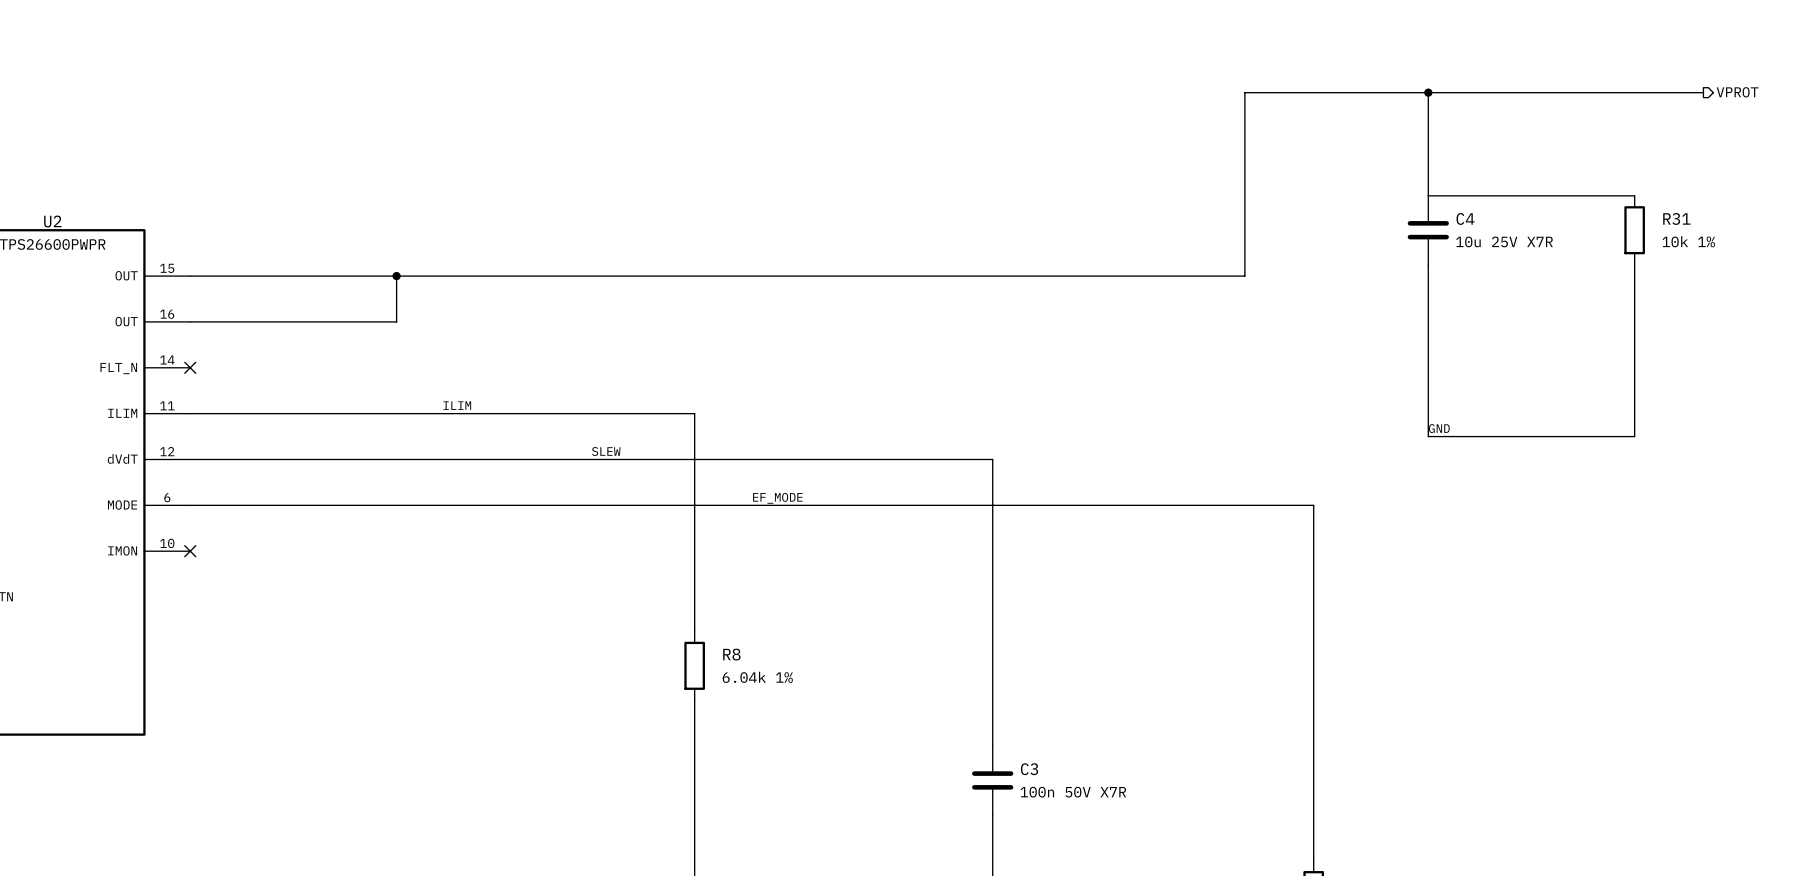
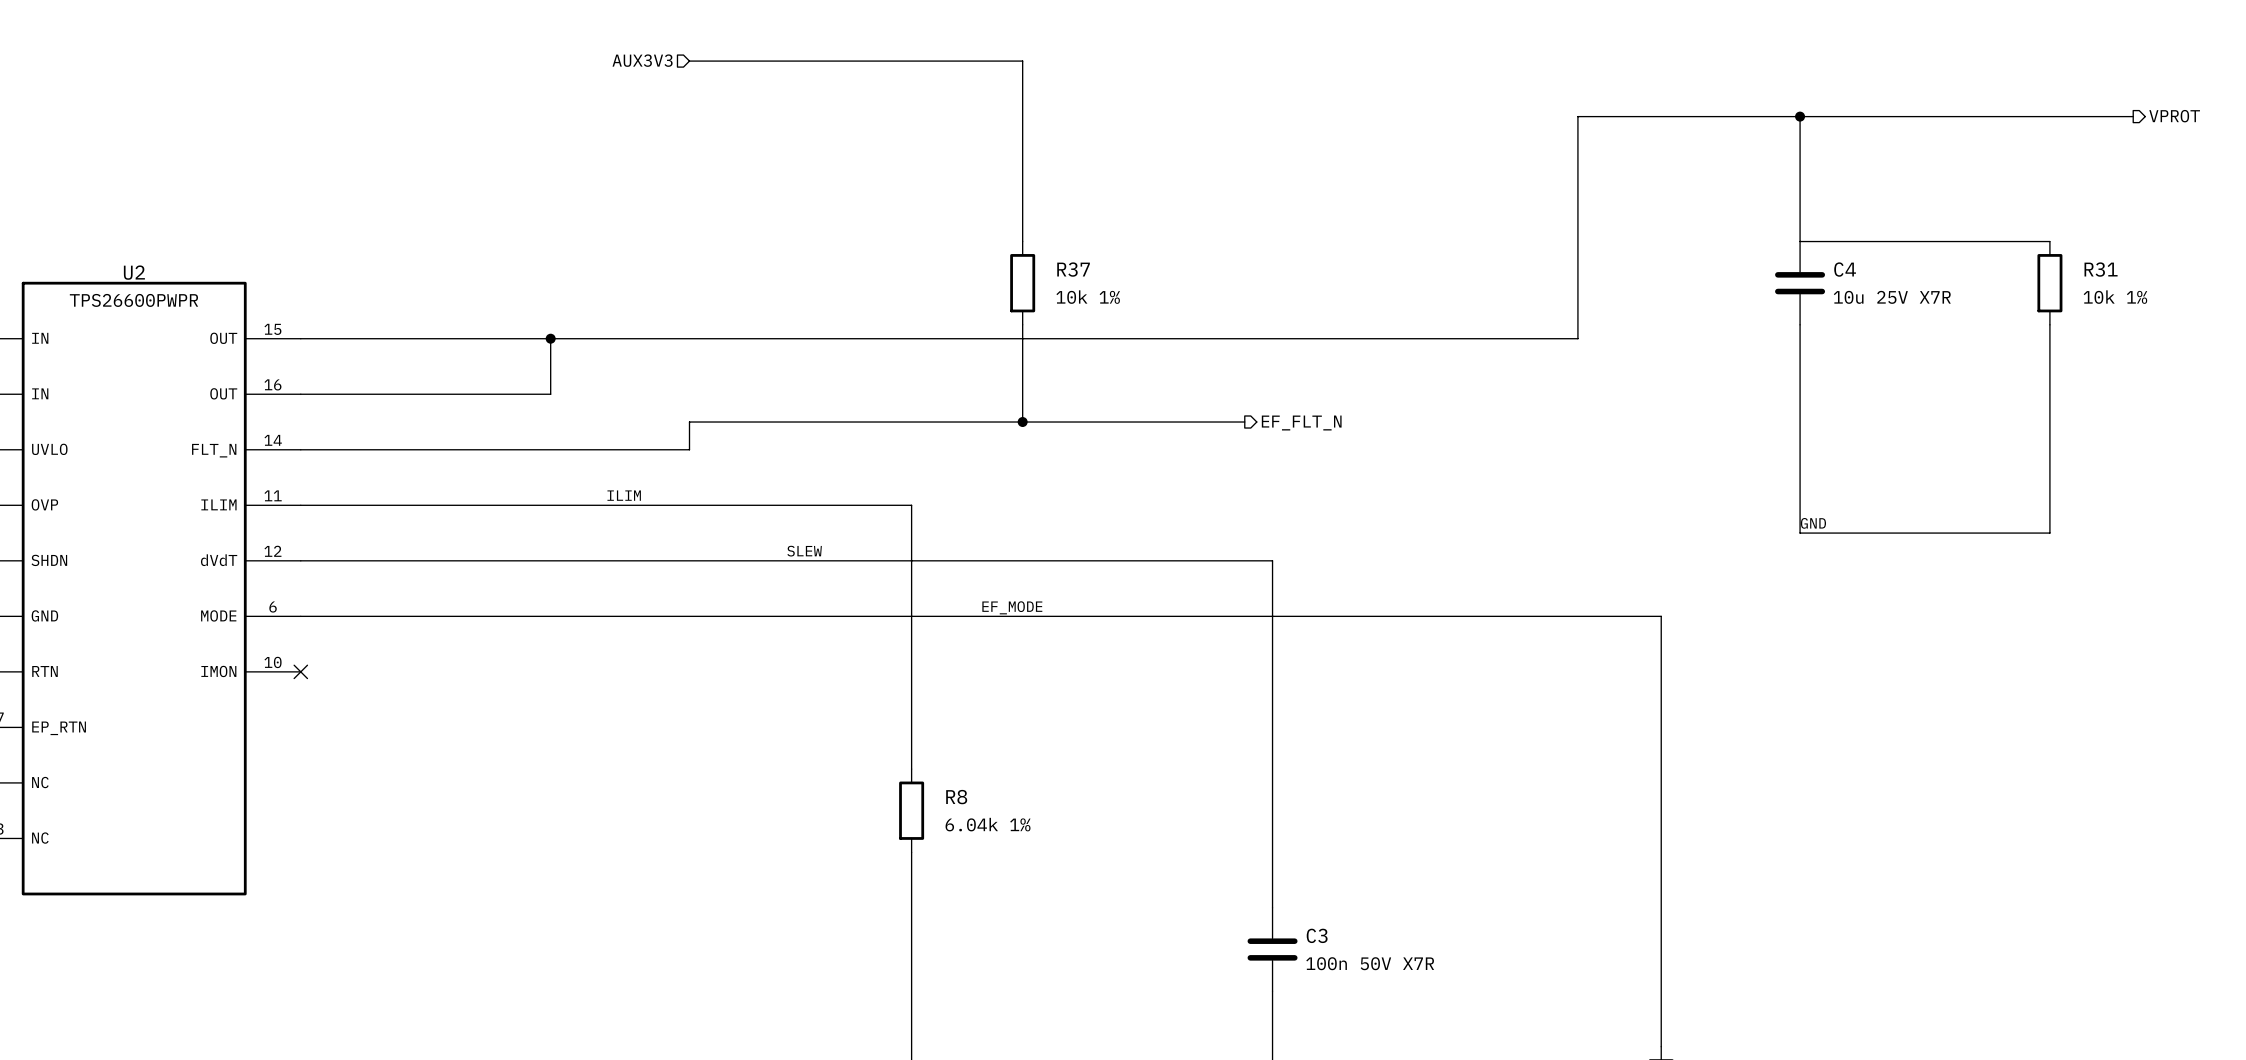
hierarchical label: none -> AUX3V3 (642, 60)
wire: none -> (689, 61) (1022, 61) (1022, 241)
R37: none -> 10k 1% (1022, 283)
wire: none -> (1022, 324) (1022, 422)
junction: none -> (1022, 422)
wire: none -> (1244, 422) (689, 422) (689, 449) (300, 449)
hierarchical label: none -> EF_FLT_N (1301, 423)
no-connect mark: (190, 367) -> none

